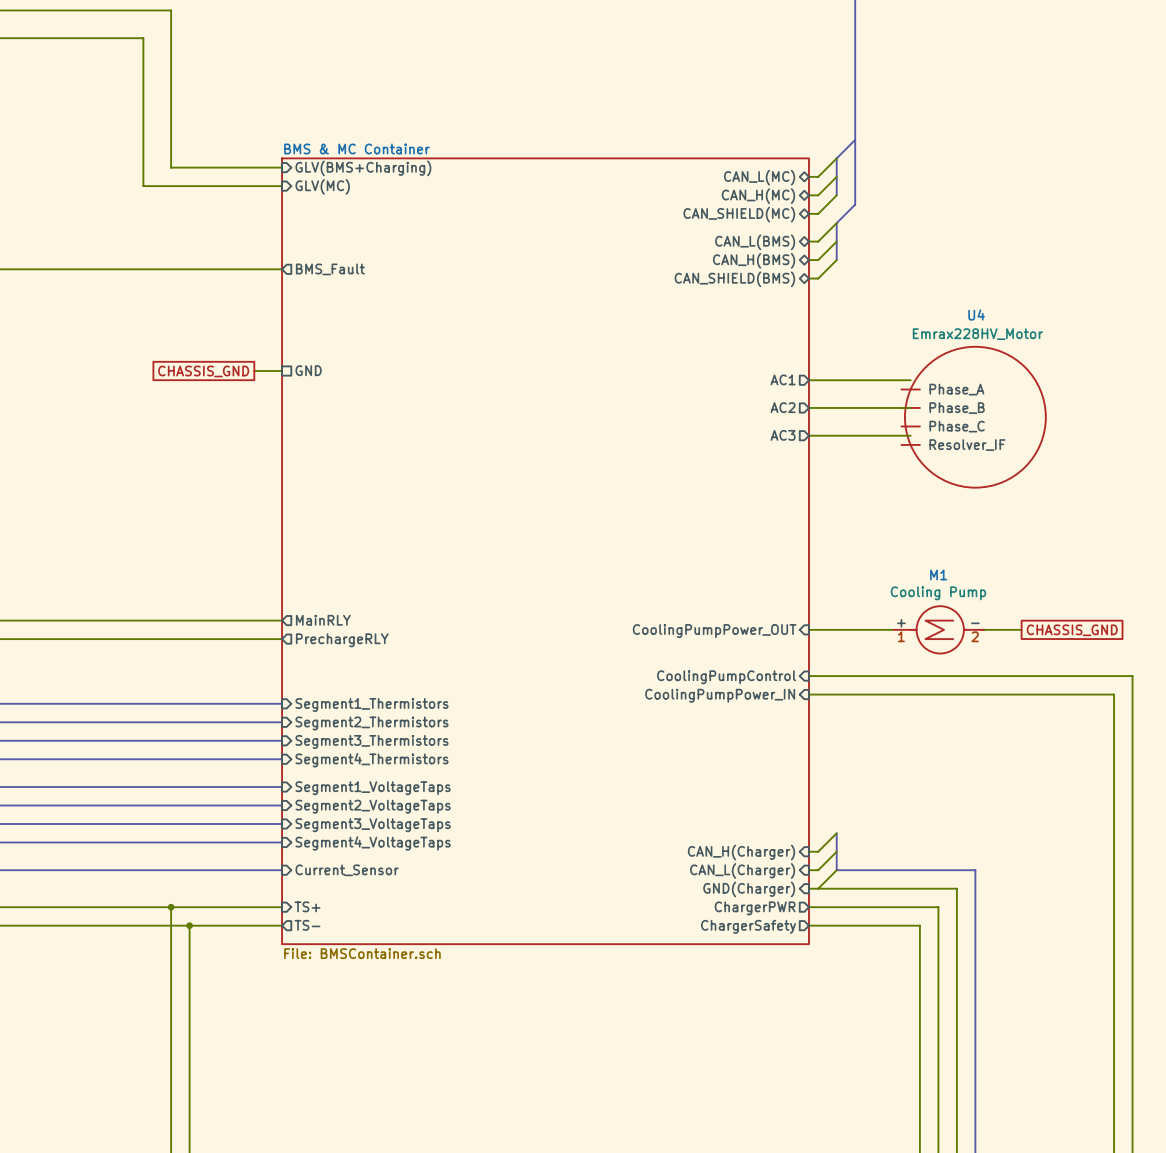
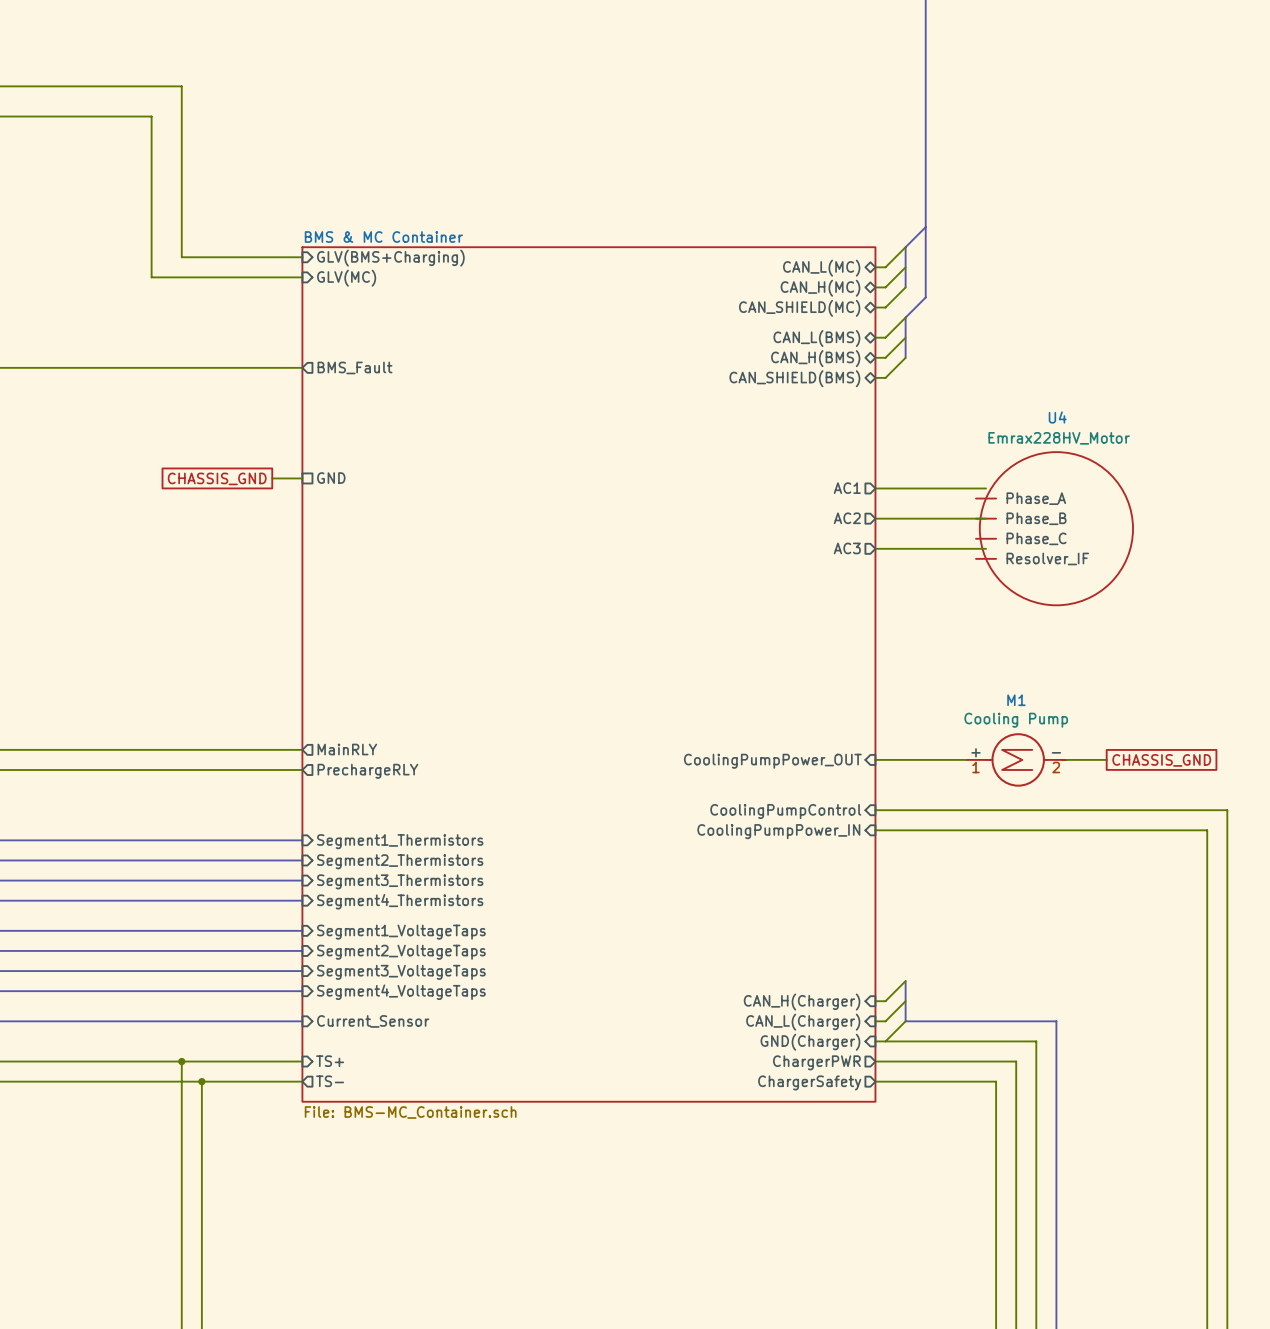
sheet BMS & MC Container value: File: BMSContainer.sch (362, 953) -> File: BMS-MC_Container.sch (410, 1112)

